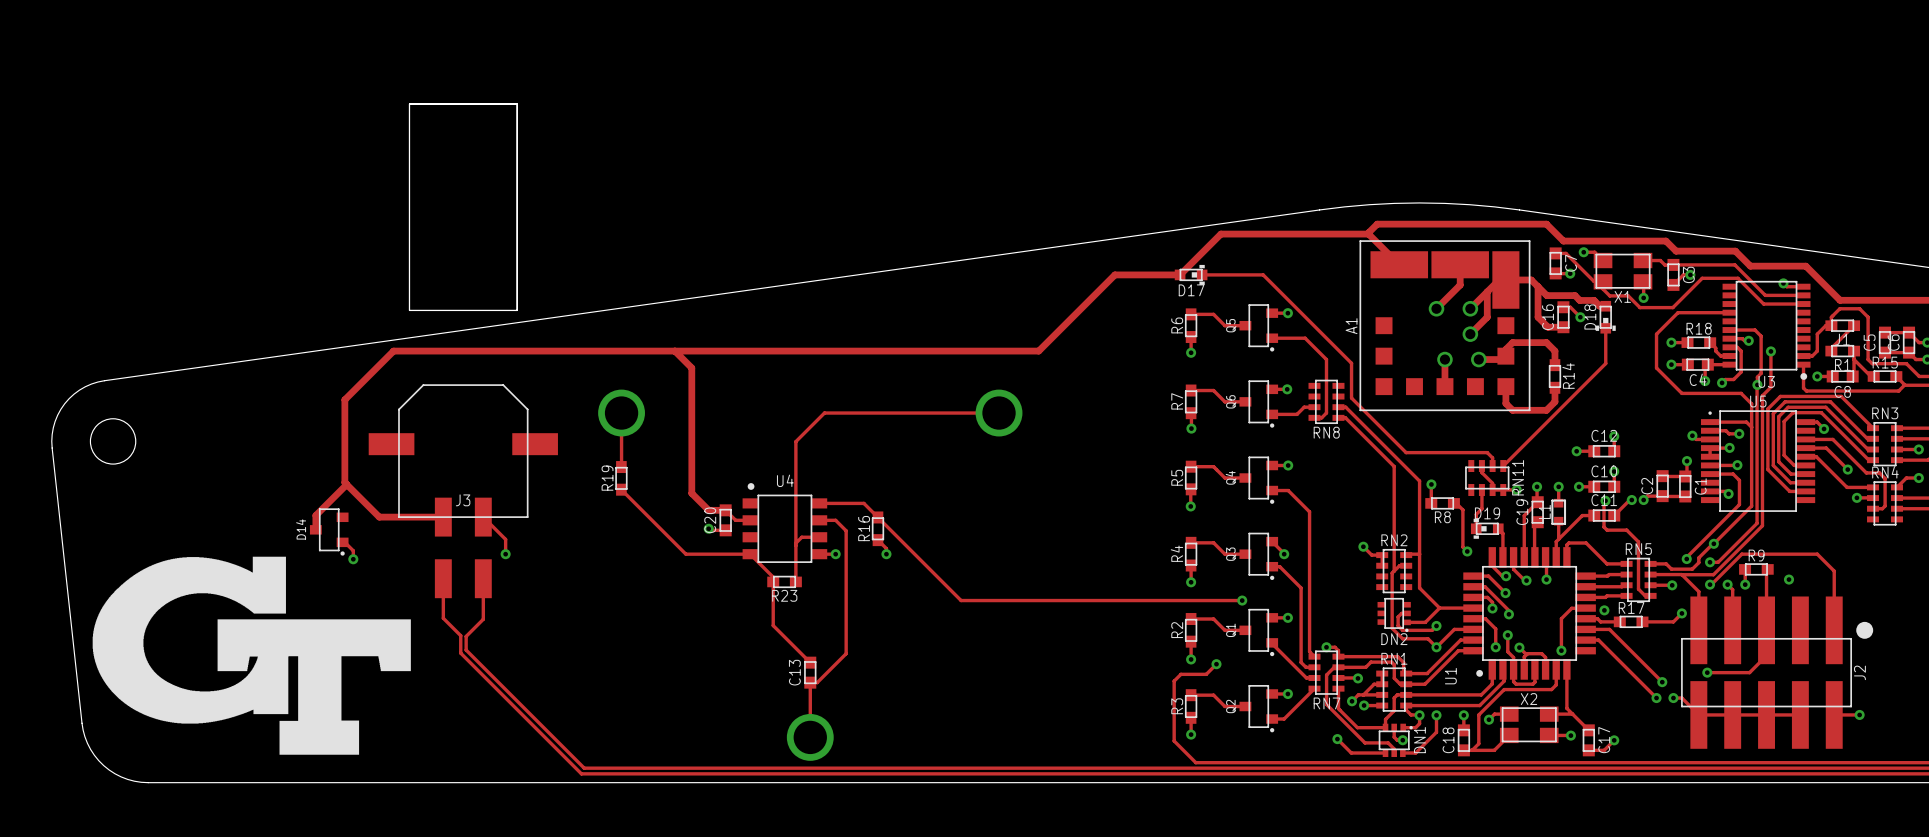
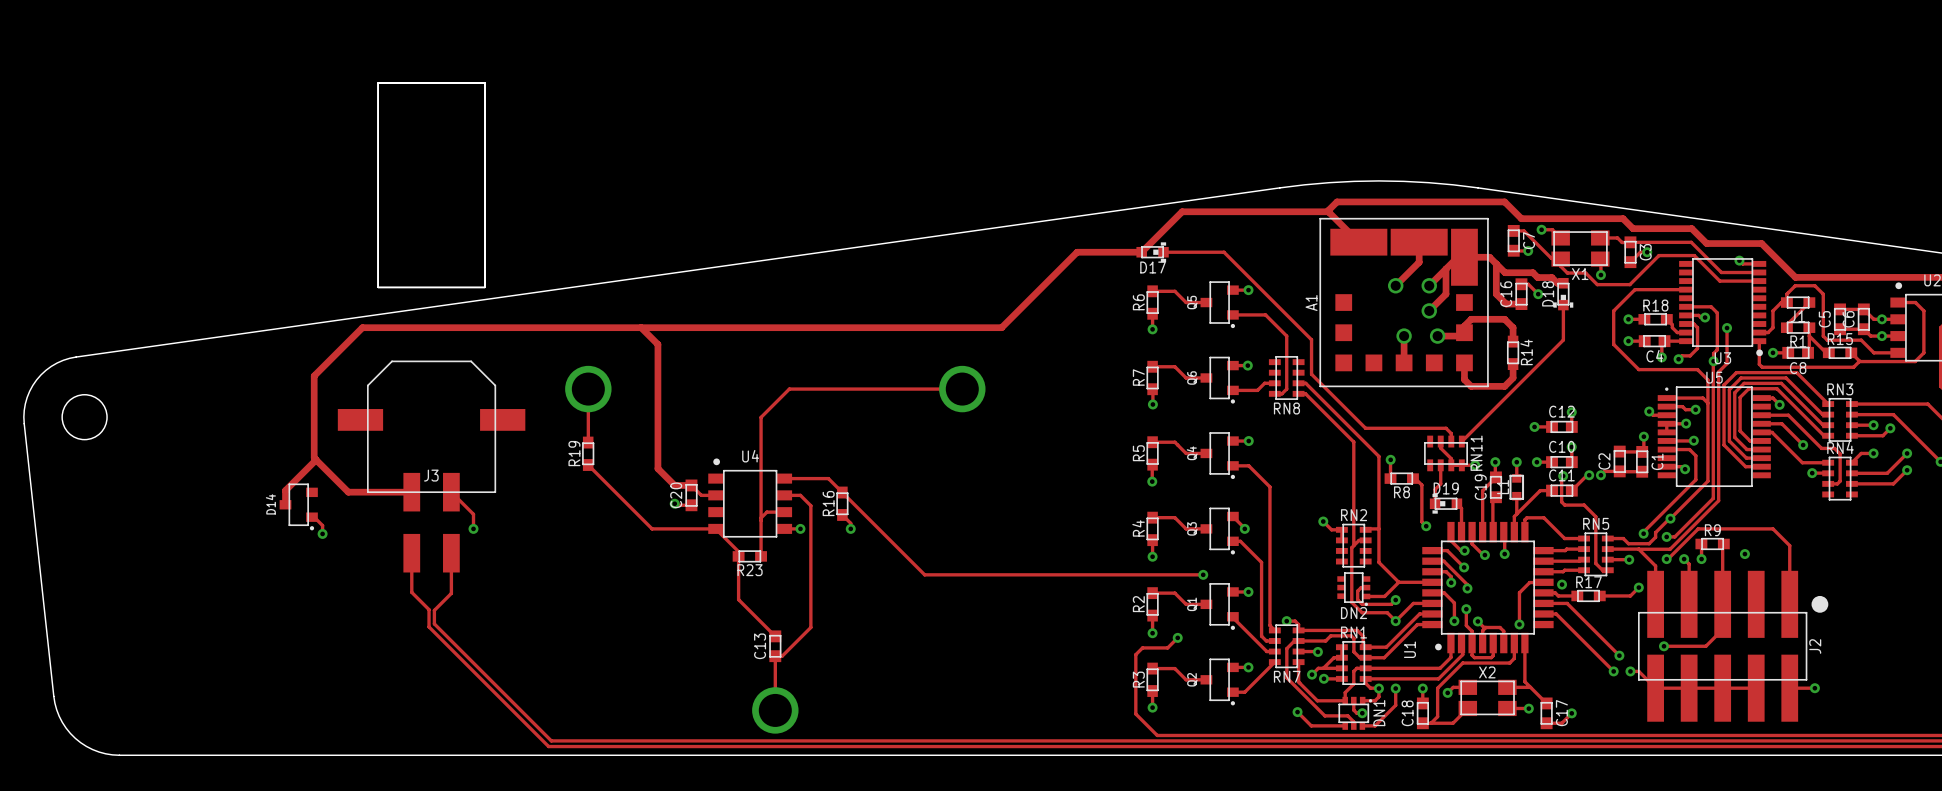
drawing: [92, 556, 411, 755] -> none

